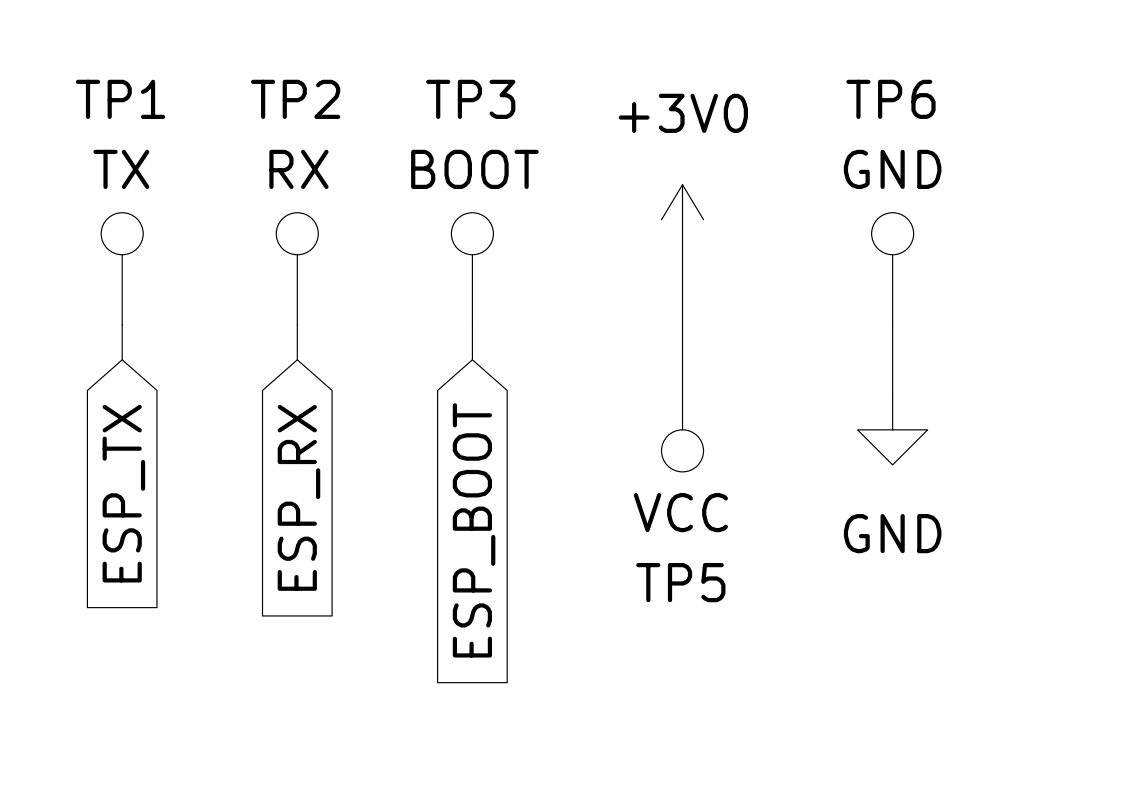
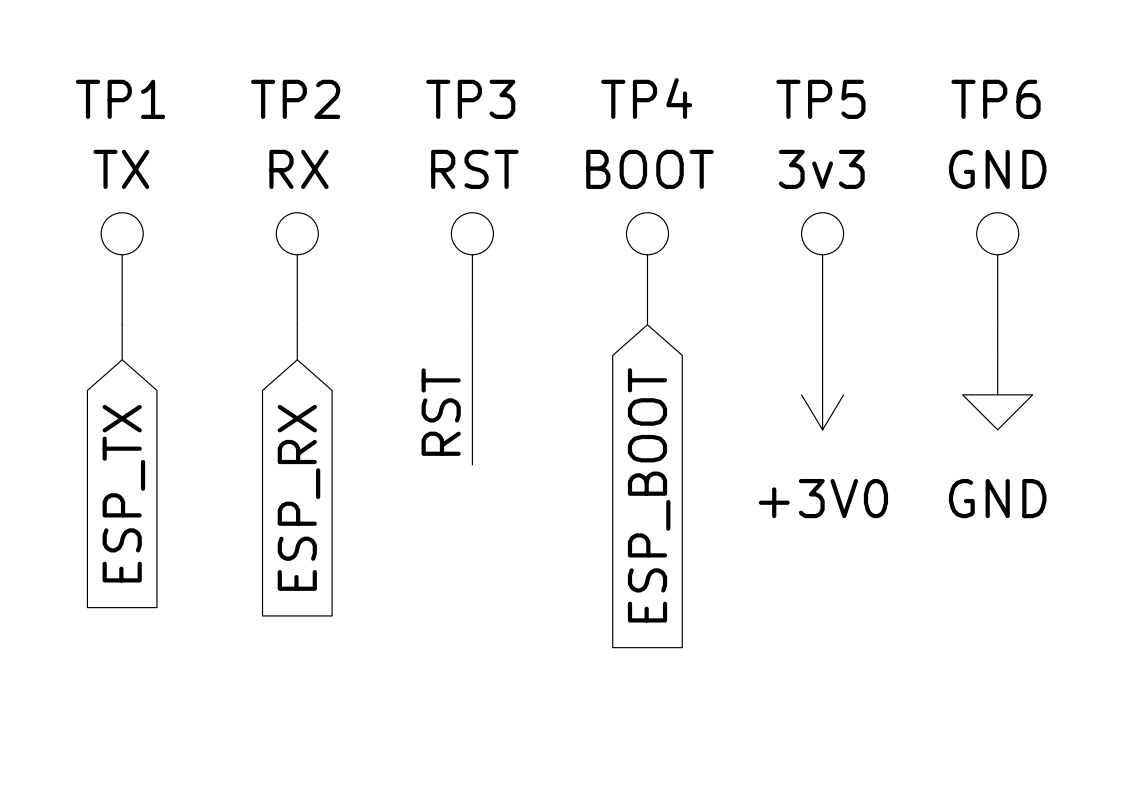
TP3 value: BOOT (474, 169) -> RST (474, 169)
power symbol rotation: 0° (682, 219) -> 180° (822, 394)
power symbol position: +3V0 (682, 219) -> +3V0 (822, 394)
wire: (682, 254) (682, 359) -> (472, 359) (472, 464)
TP4: none -> BOOT (647, 268)
TP6 position: (892, 268) -> (997, 268)
wire: none -> (822, 324) (822, 359)
wire: (892, 324) (892, 394) -> none
wire: none -> (997, 324) (997, 359)
label: none -> RST (441, 412)
TP5 position: (682, 415) -> (822, 268)
power symbol position: GND (892, 429) -> GND (997, 394)
TP5 rotation: 0° (682, 450) -> 180° (822, 233)
TP5 value: VCC (680, 512) -> 3v3 (821, 169)
global label position: ESP_BOOT (474, 530) -> ESP_BOOT (649, 495)

